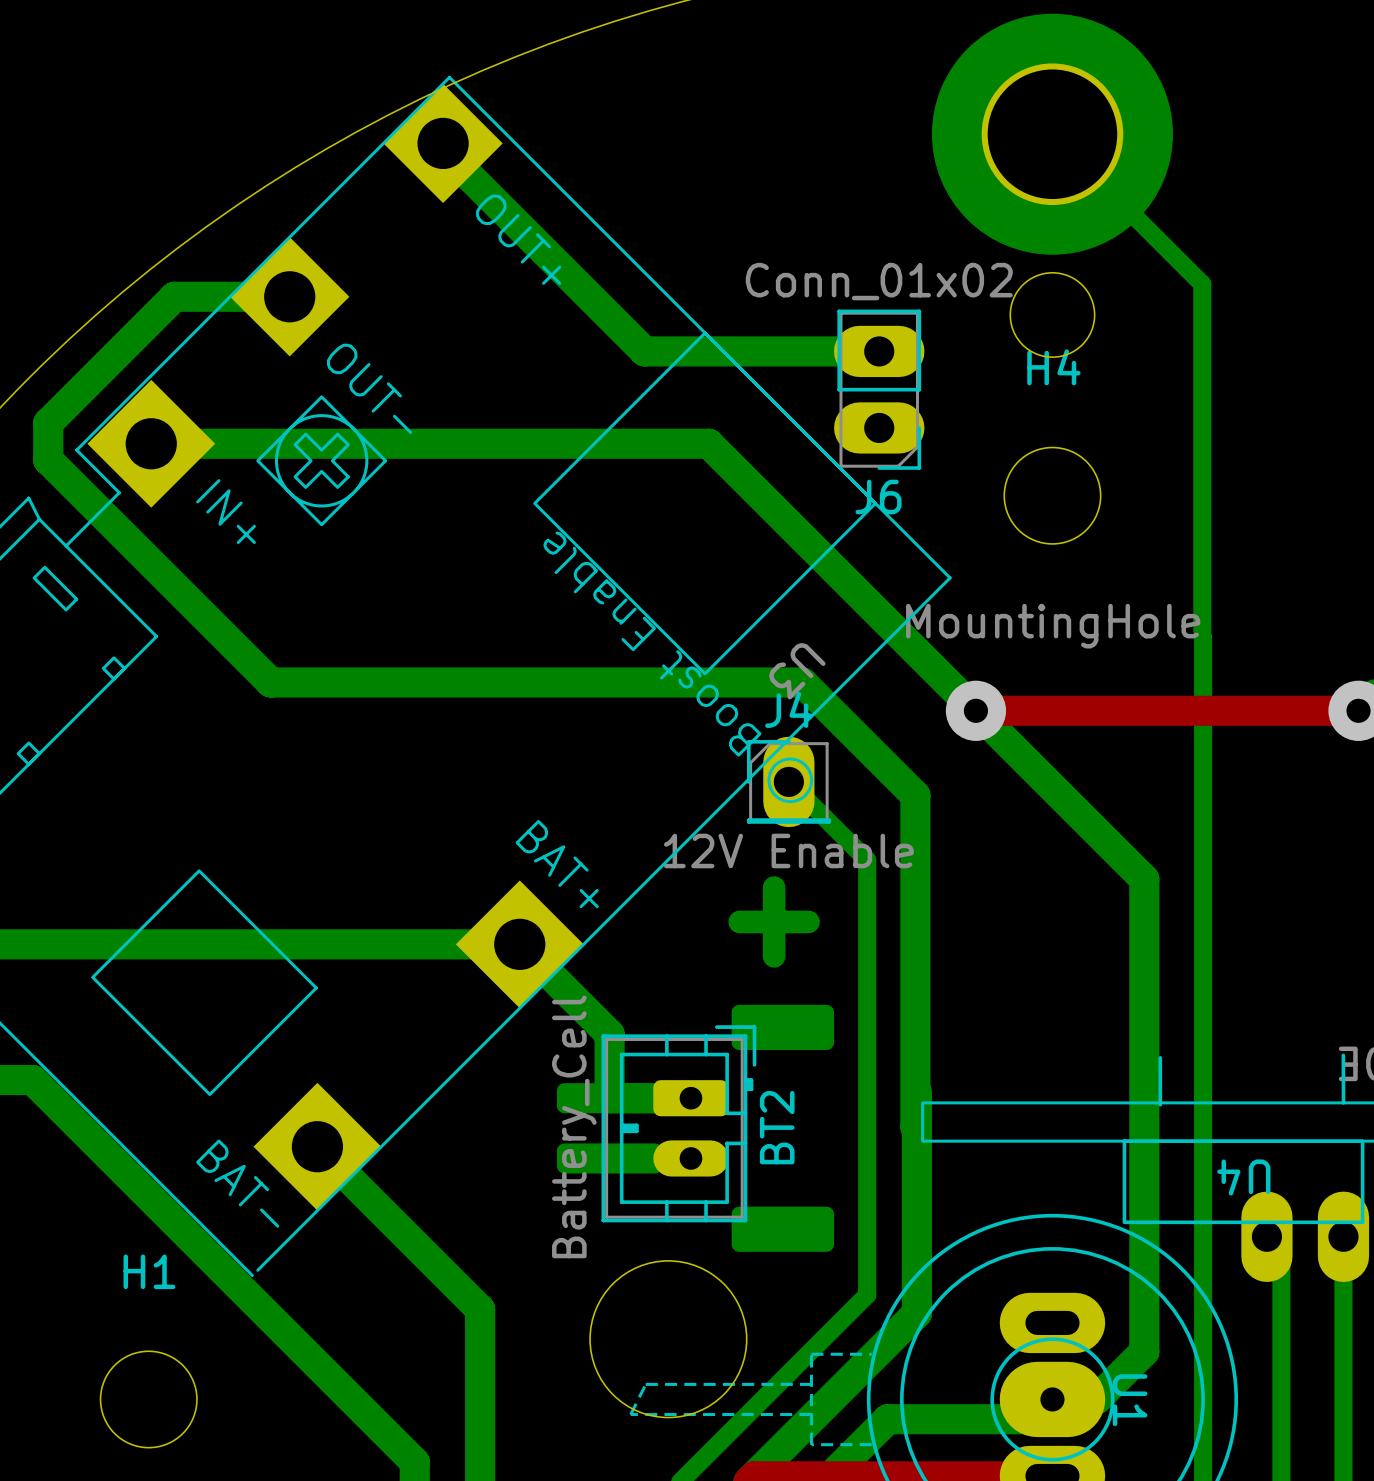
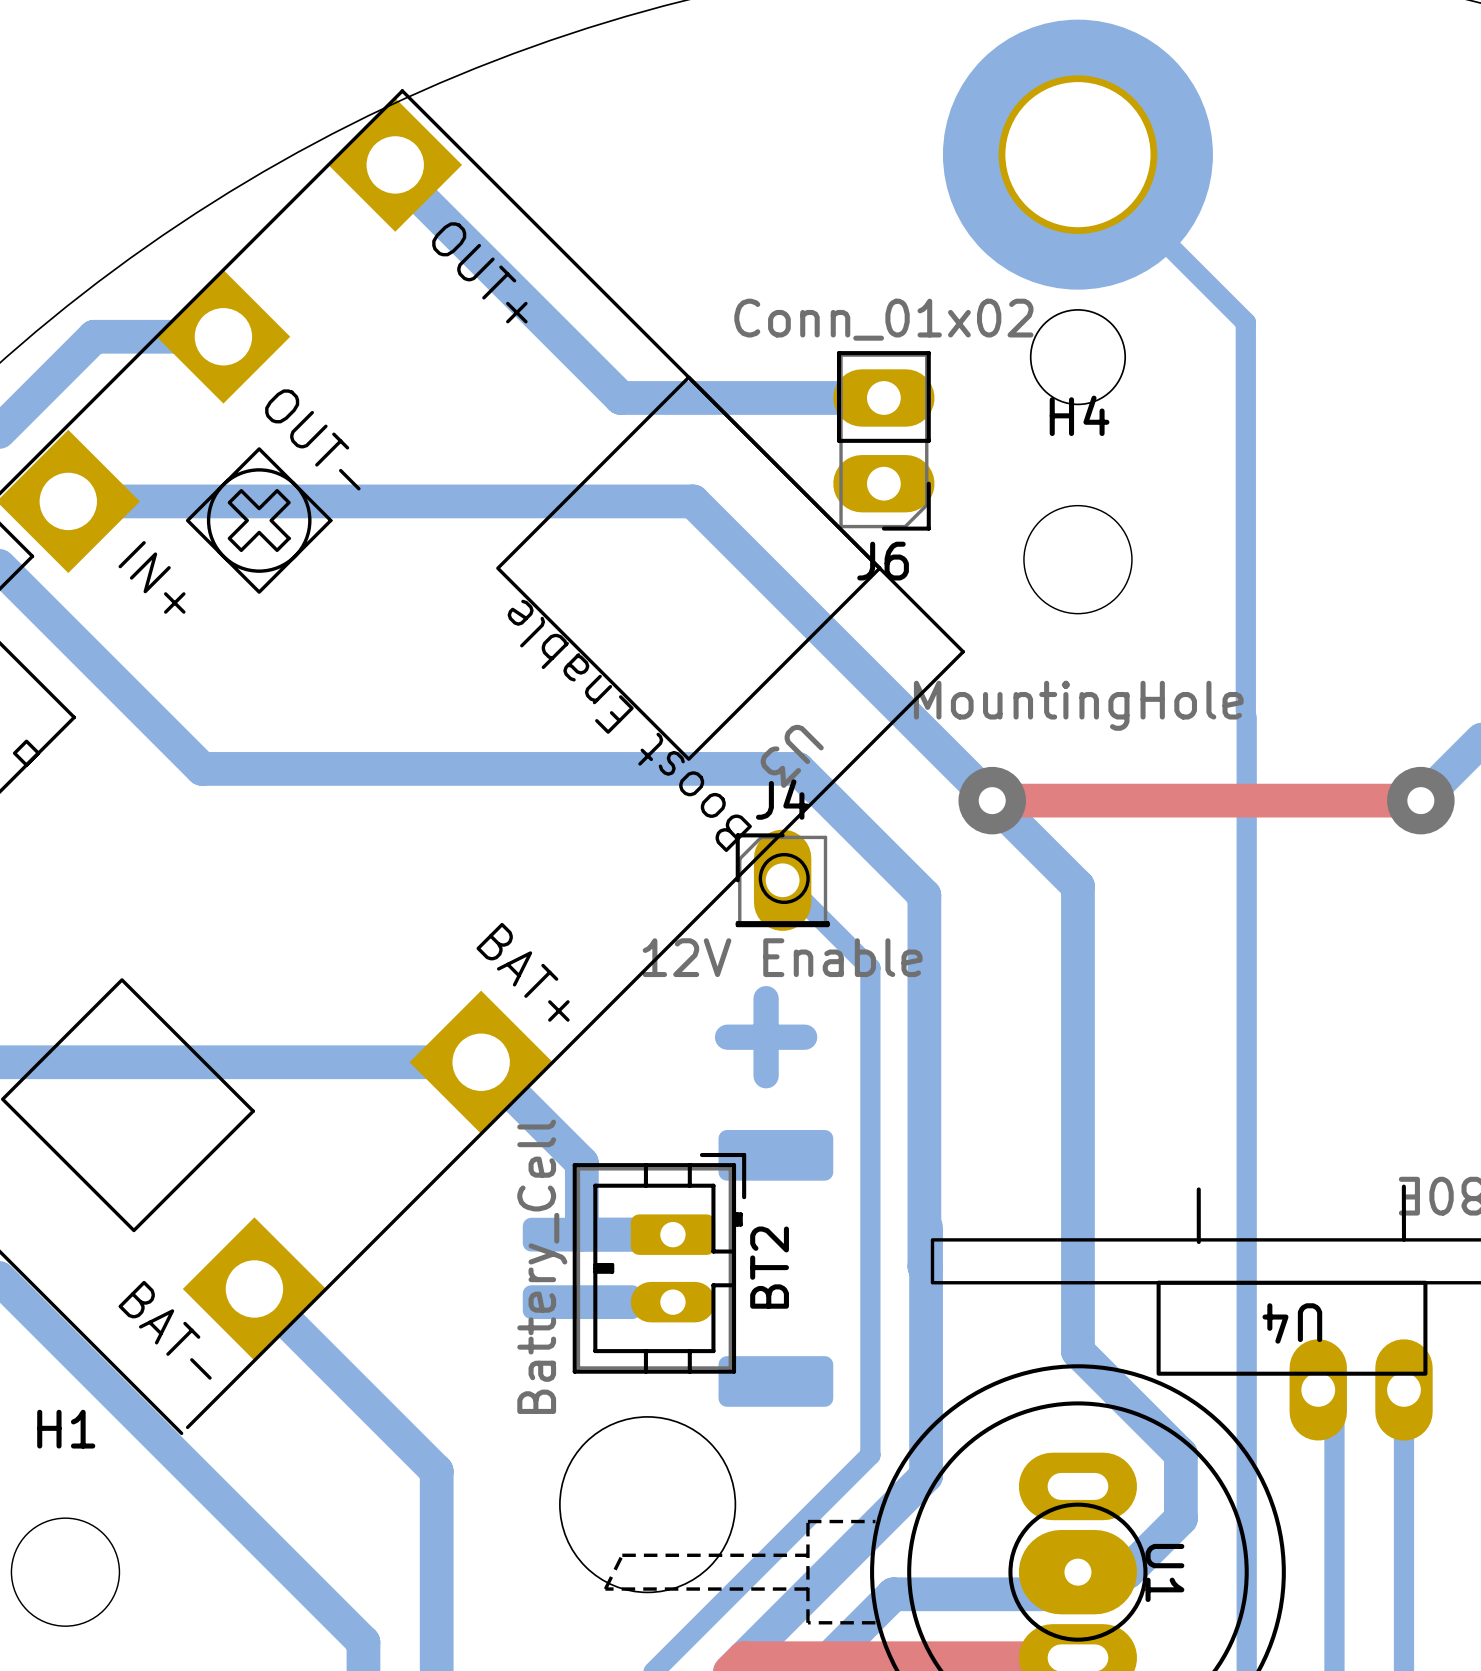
bottom track: (1052, 787) (1144, 879) (1144, 1294) -> (1077, 886) (1077, 1351) (1180, 1454)

